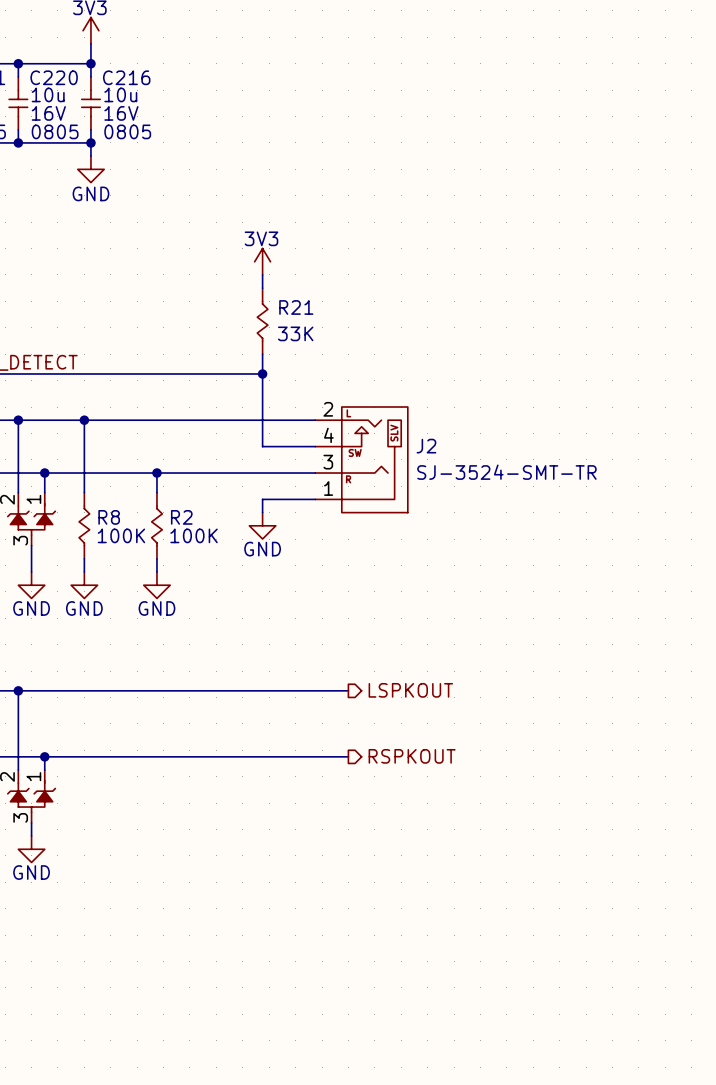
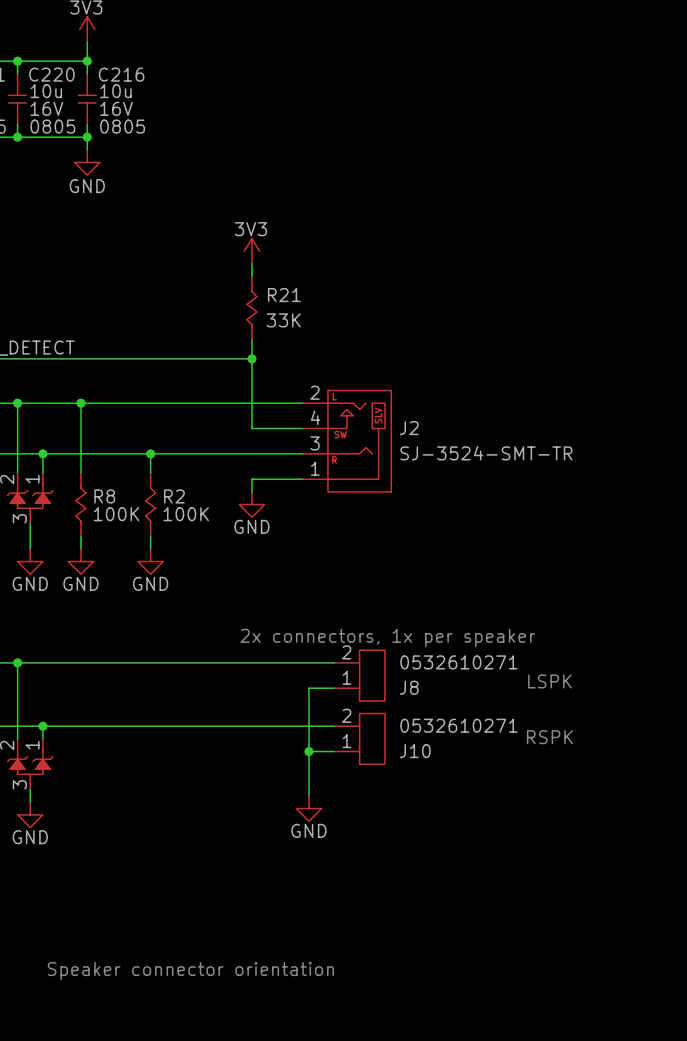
text: none -> 2x connectors, 1x per speaker (387, 637)
hierarchical label: LSPKOUT (410, 690) -> none
J8: none -> 0532610271 (359, 675)
text: none -> LSPK (549, 681)
wire: none -> (334, 688) (308, 688) (308, 795)
hierarchical label: RSPKOUT (412, 756) -> none
text: none -> RSPK (549, 737)
J10: none -> 0532610271 (359, 738)
wire: none -> (308, 751) (334, 751)
junction: none -> (308, 751)
power symbol: none -> GND (308, 808)
text: none -> Speaker connector orientation (190, 971)

